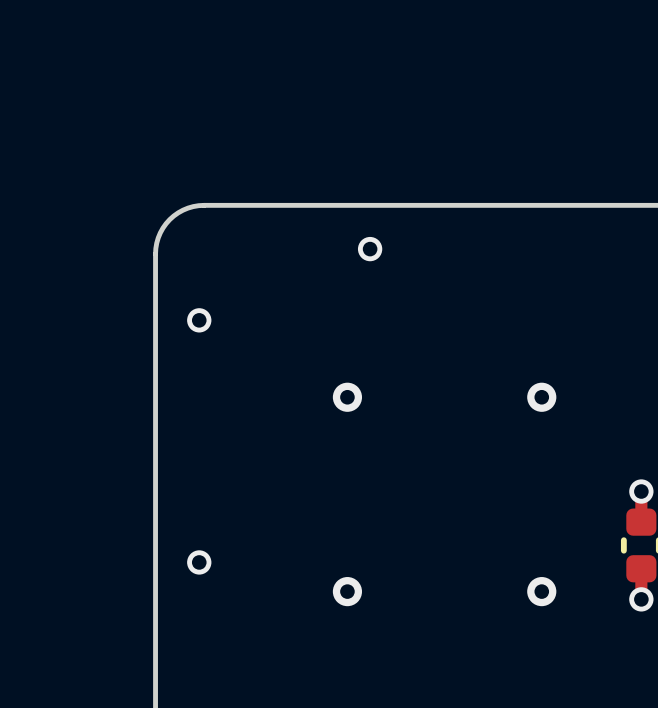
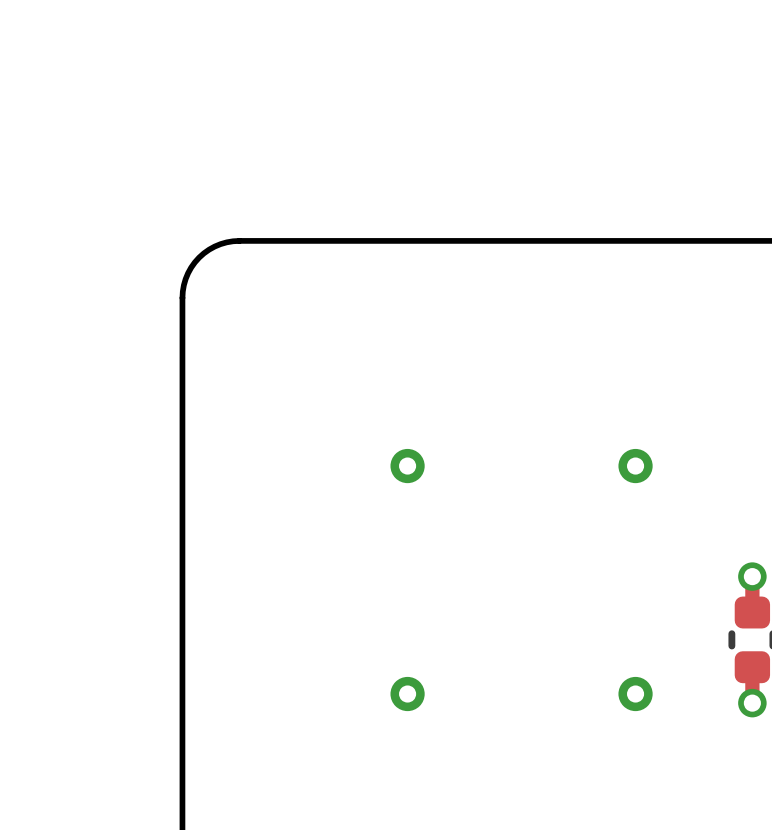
via: (370, 249) -> none
via: (199, 320) -> none
via: (199, 562) -> none

